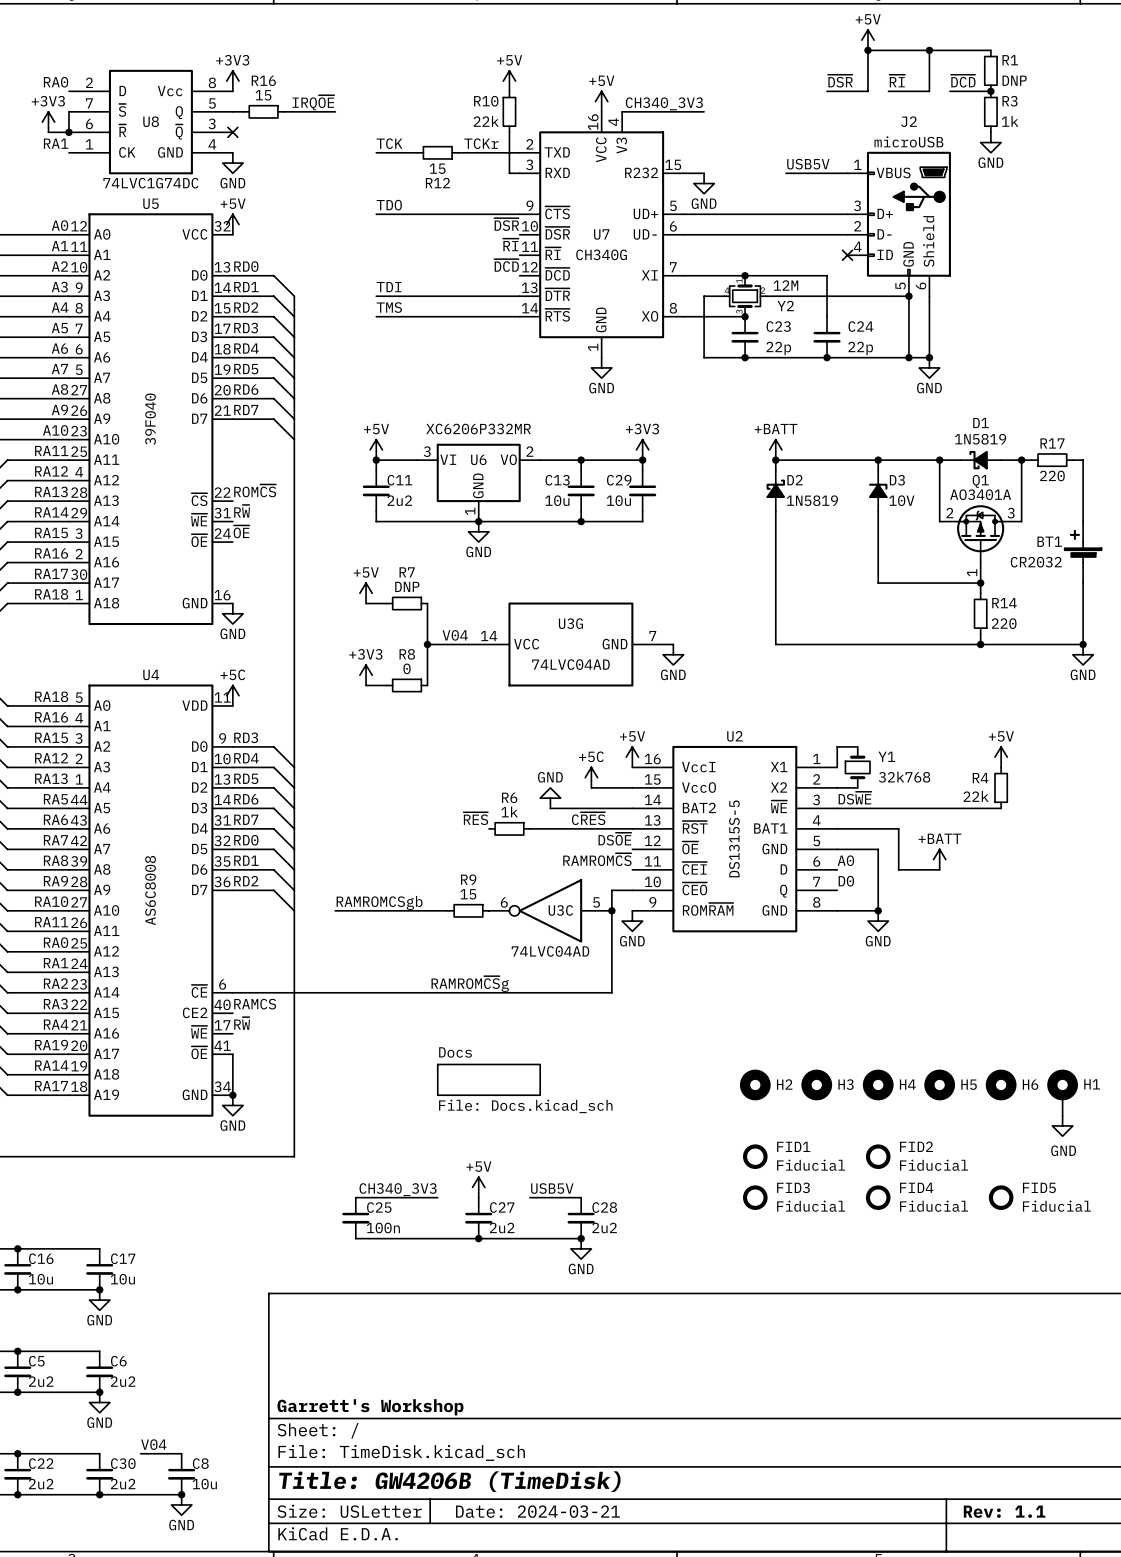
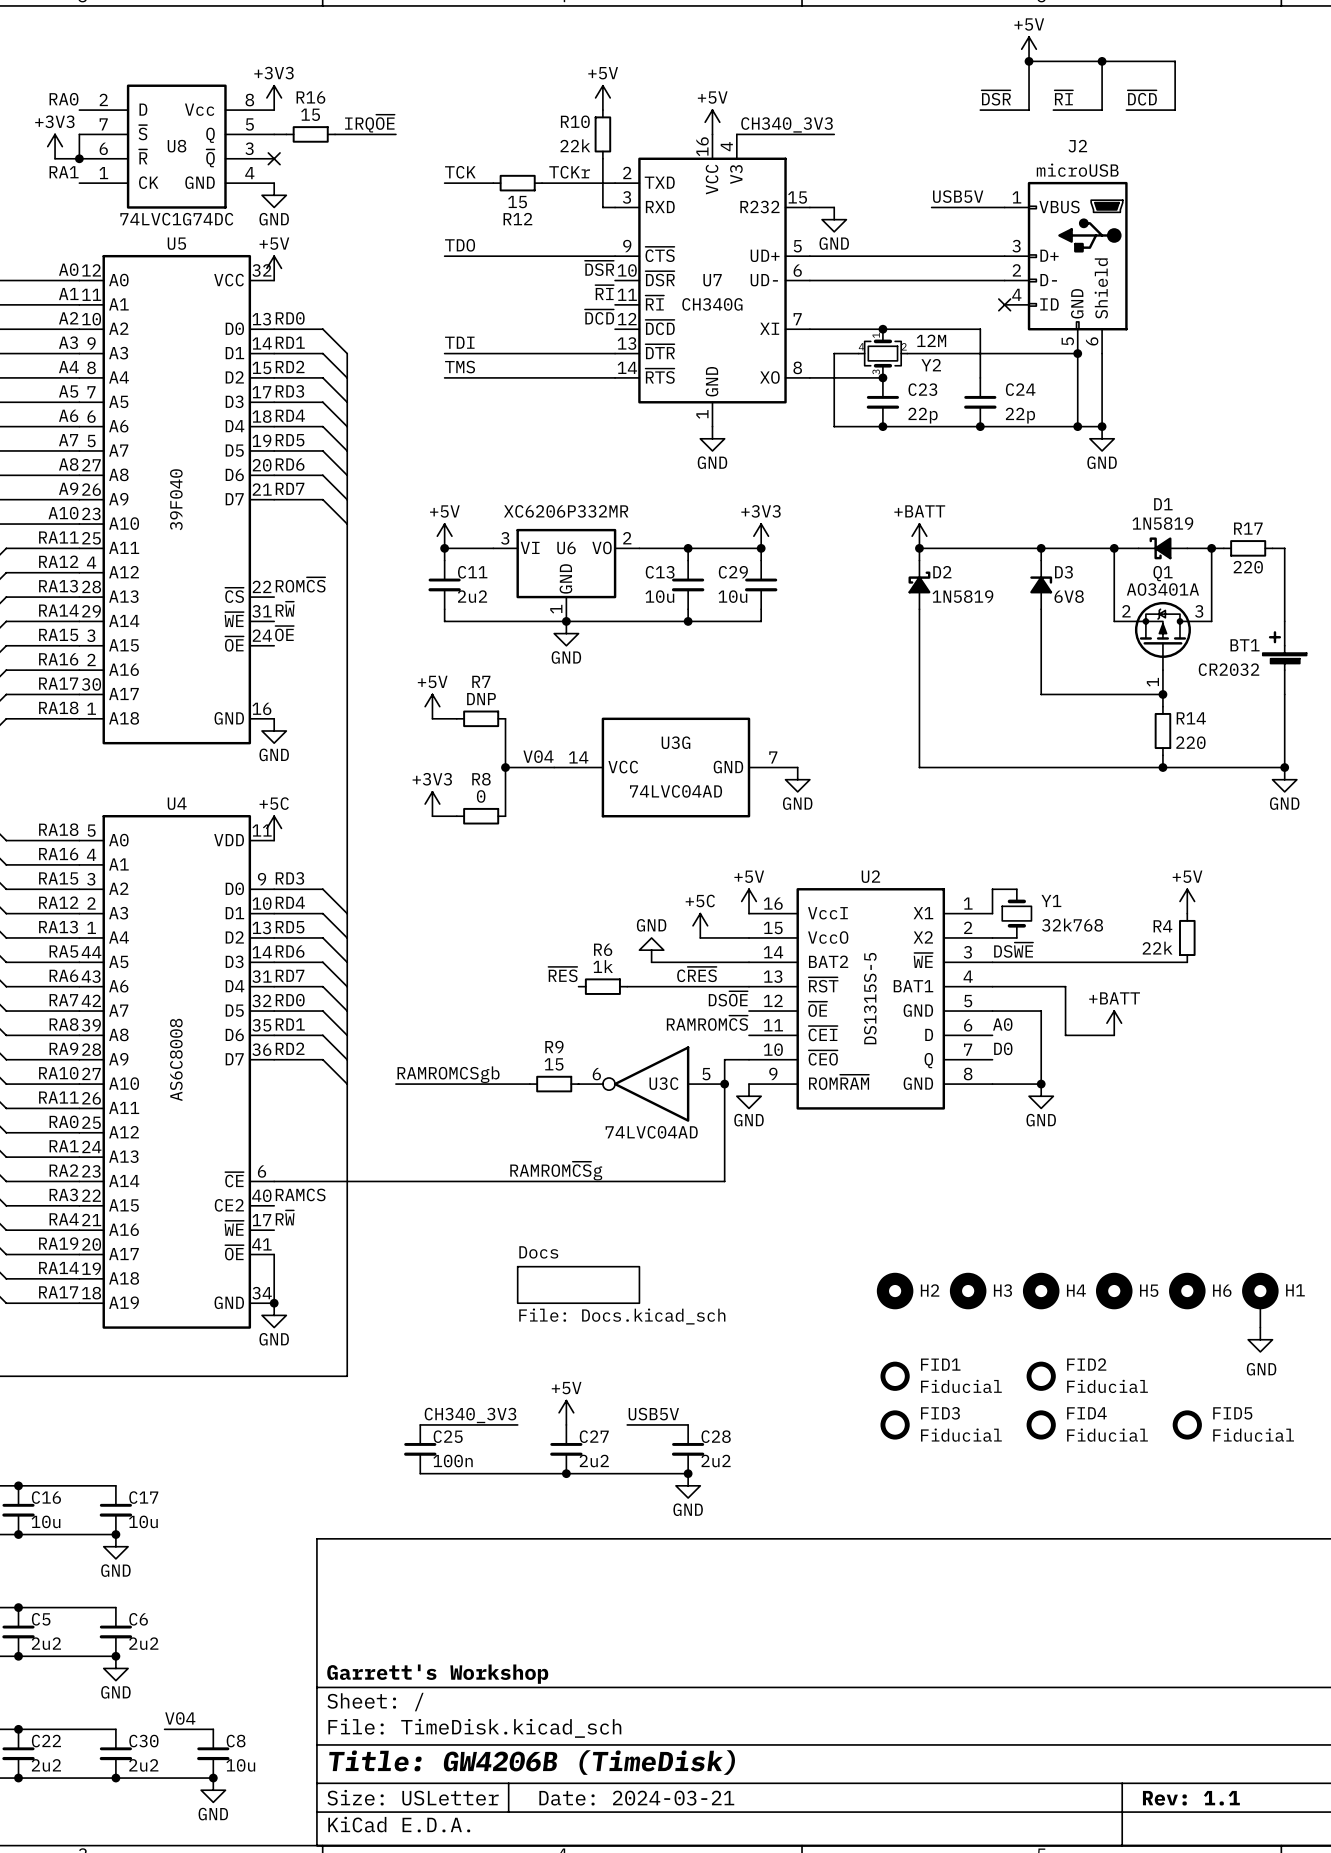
wire: none -> (1175, 61) (1175, 110)
R1: DNP (990, 70) -> none
junction: (990, 91) -> none
R3: 1k (990, 111) -> none
power symbol: GND (990, 142) -> none
D3 value: 10V (901, 500) -> 6V8 (1069, 596)

